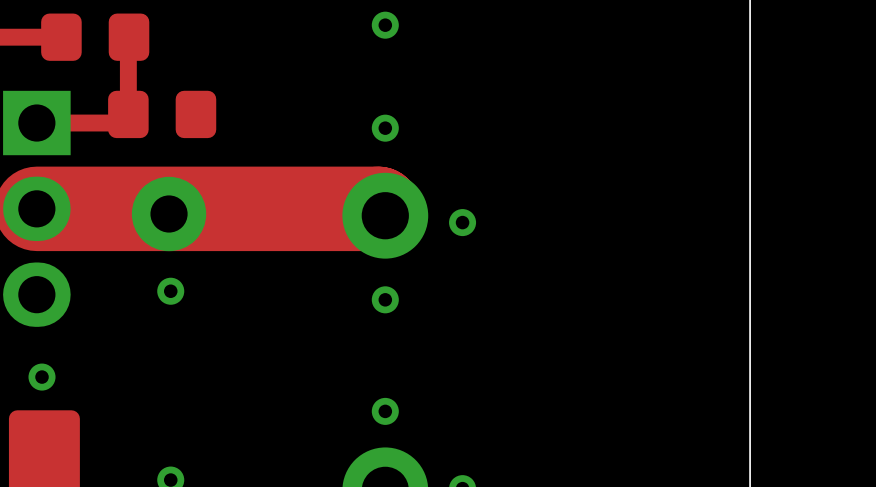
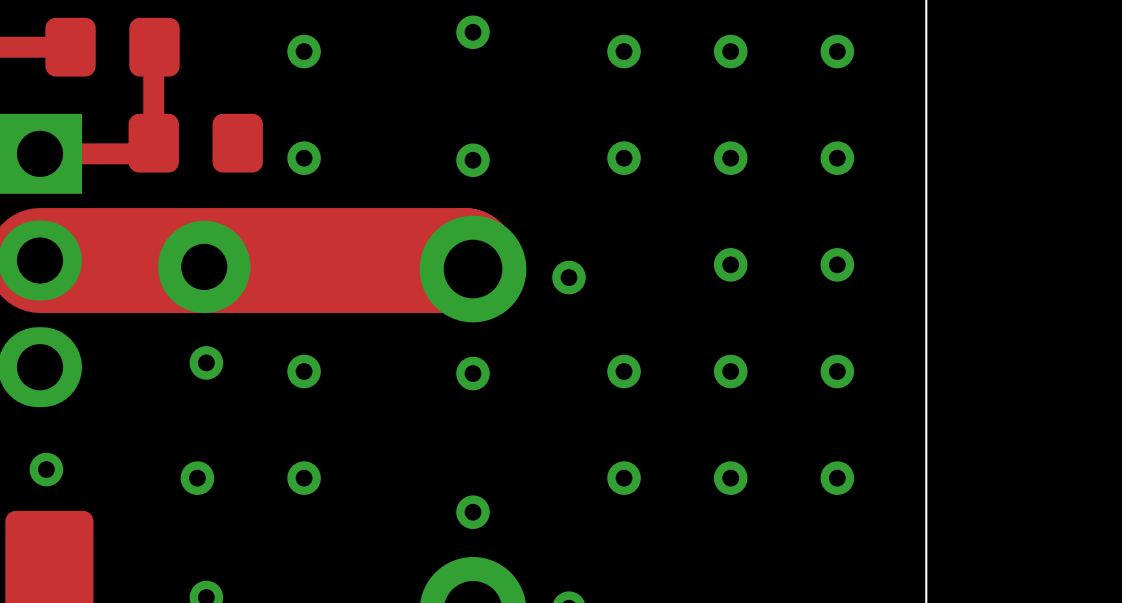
via: none -> (304, 51)
via: none -> (624, 51)
via: none -> (730, 51)
via: none -> (837, 51)
via: none -> (304, 158)
via: none -> (624, 158)
via: none -> (730, 158)
via: none -> (837, 158)
via: none -> (730, 264)
via: none -> (837, 264)
via: none -> (304, 371)
via: none -> (624, 371)
via: none -> (730, 371)
via: none -> (837, 371)
via: none -> (197, 478)
via: none -> (304, 478)
via: none -> (624, 478)
via: none -> (730, 478)
via: none -> (837, 478)

